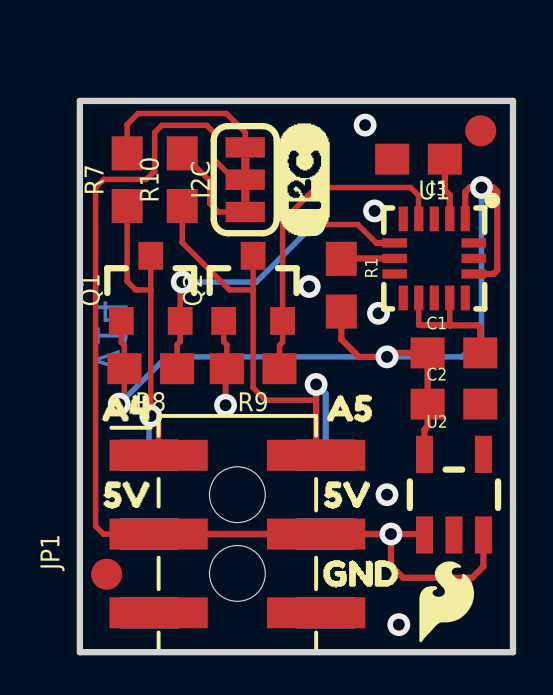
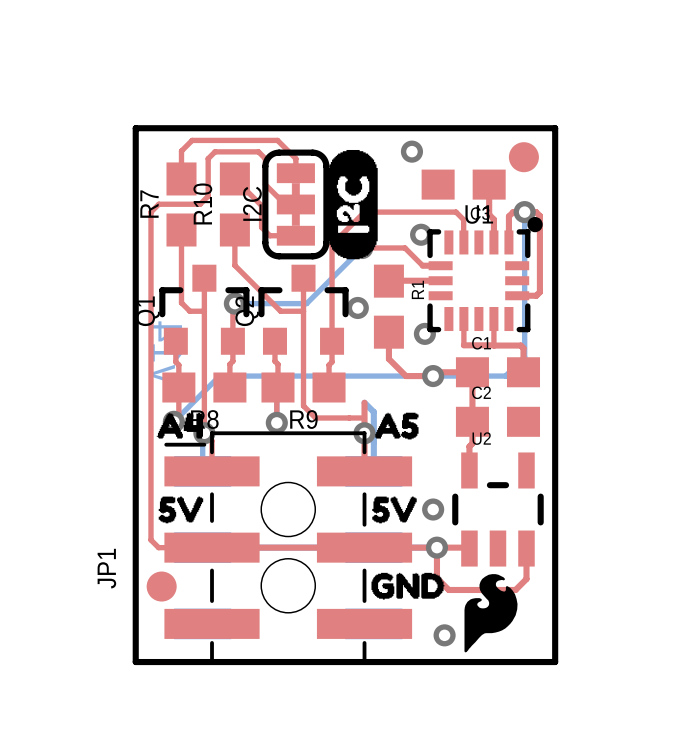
via position: (316, 384) -> (364, 433)

